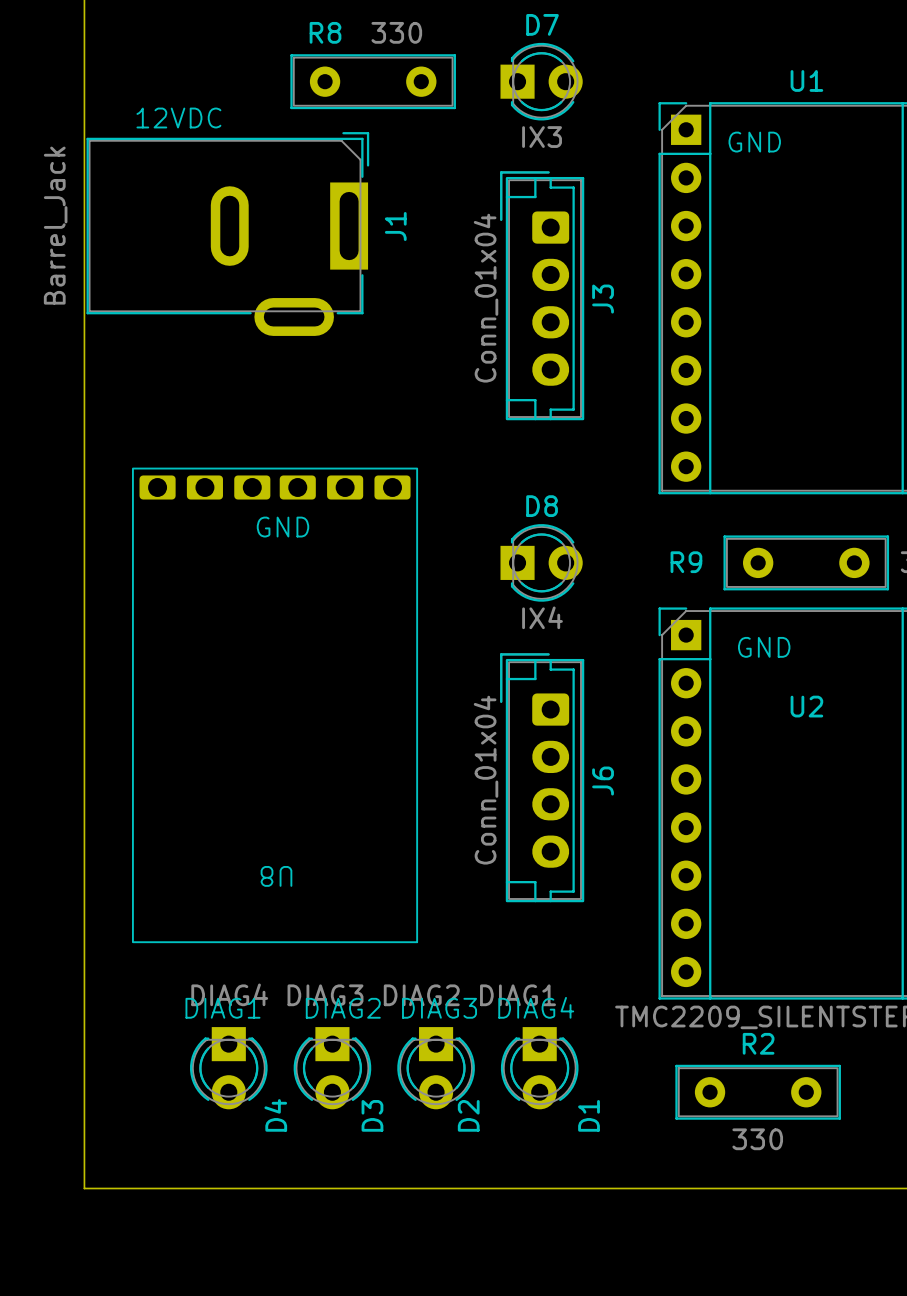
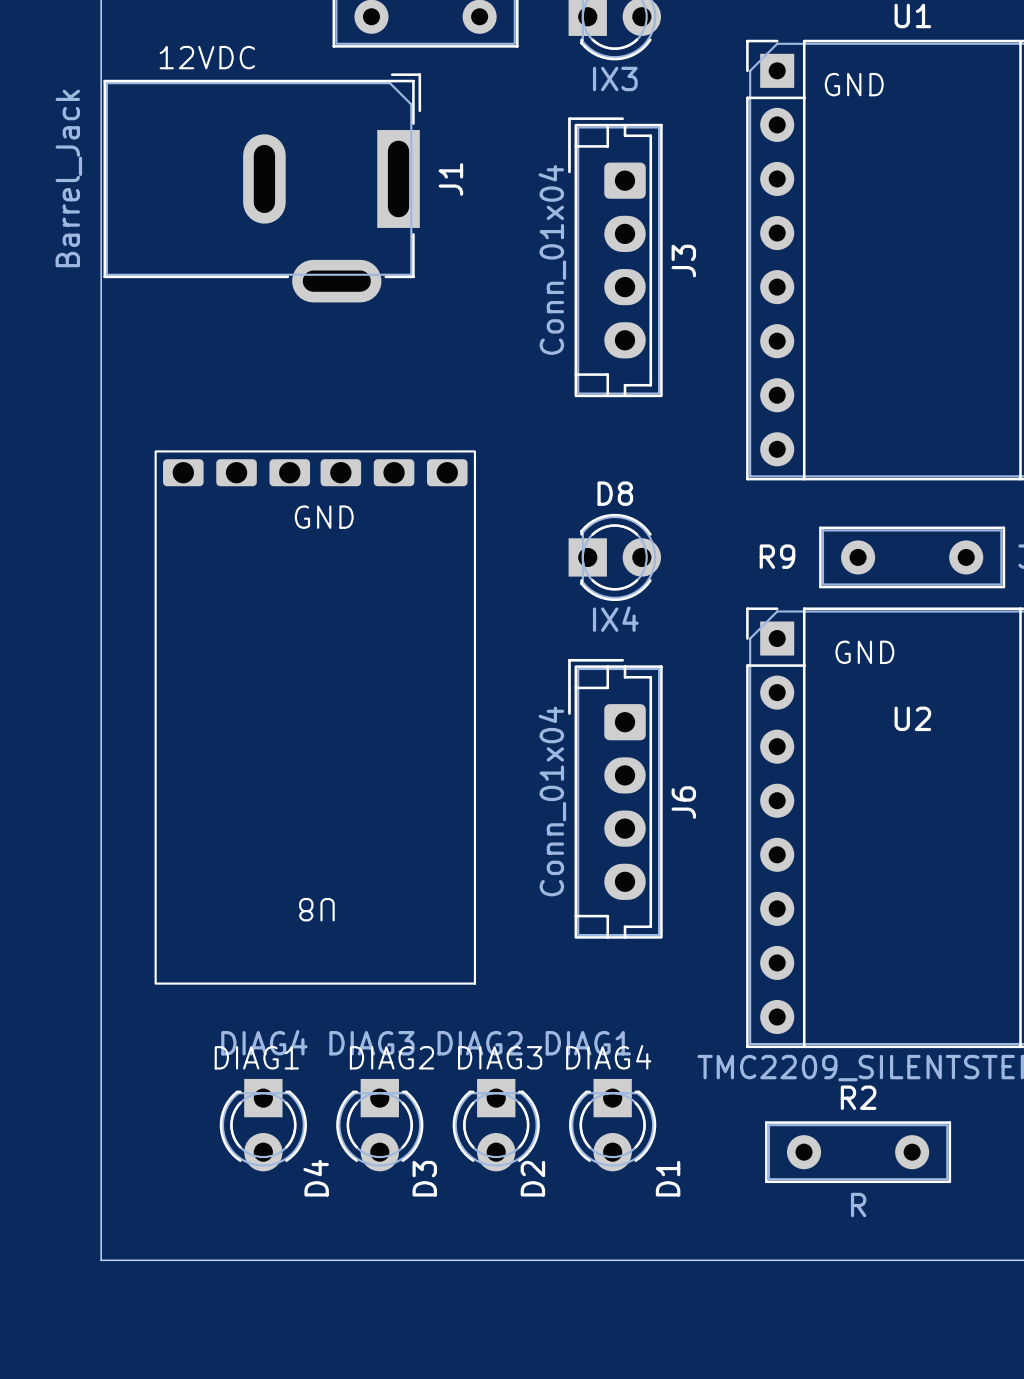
R2 value: 330 (757, 1139) -> R (858, 1205)

